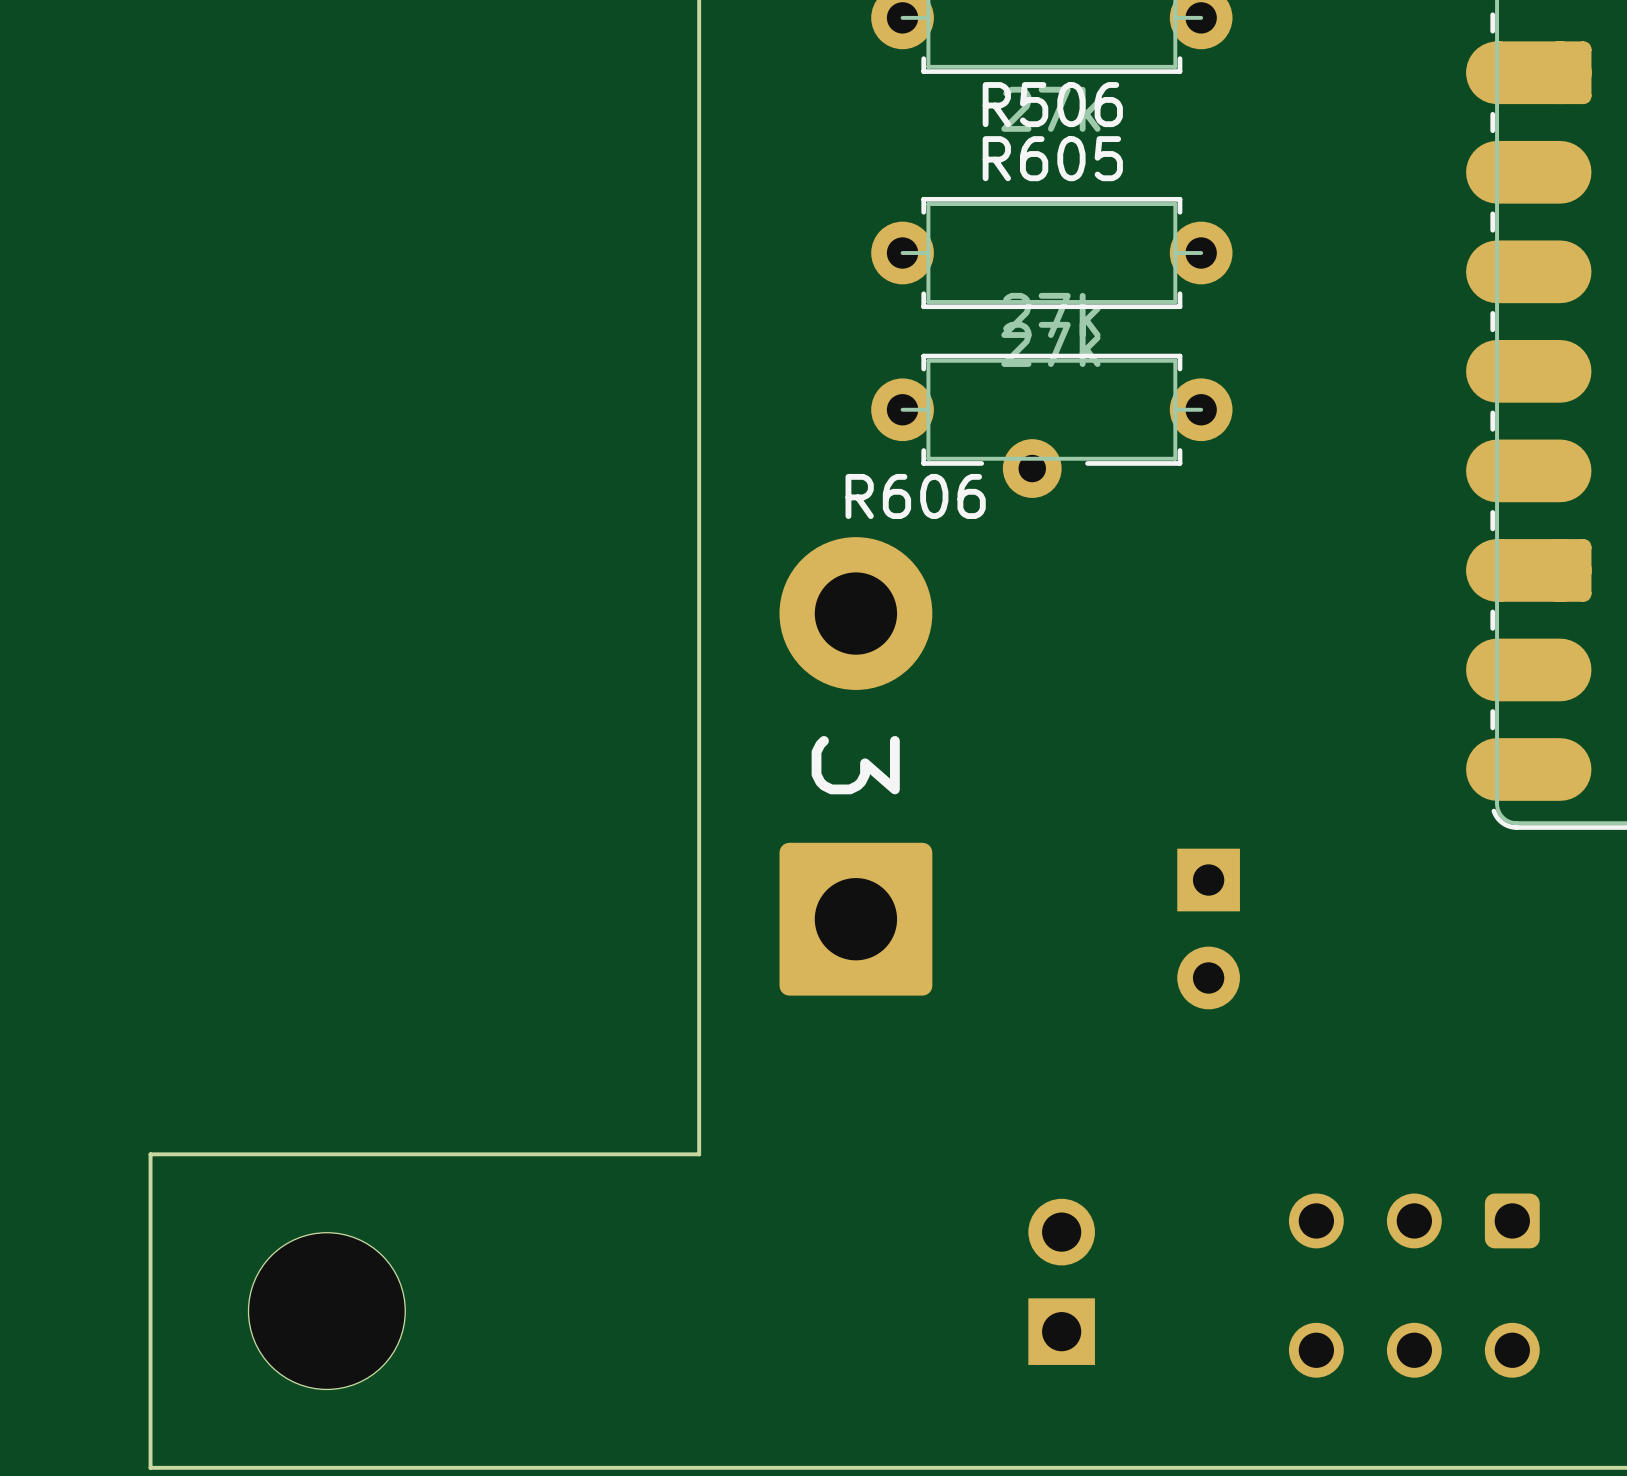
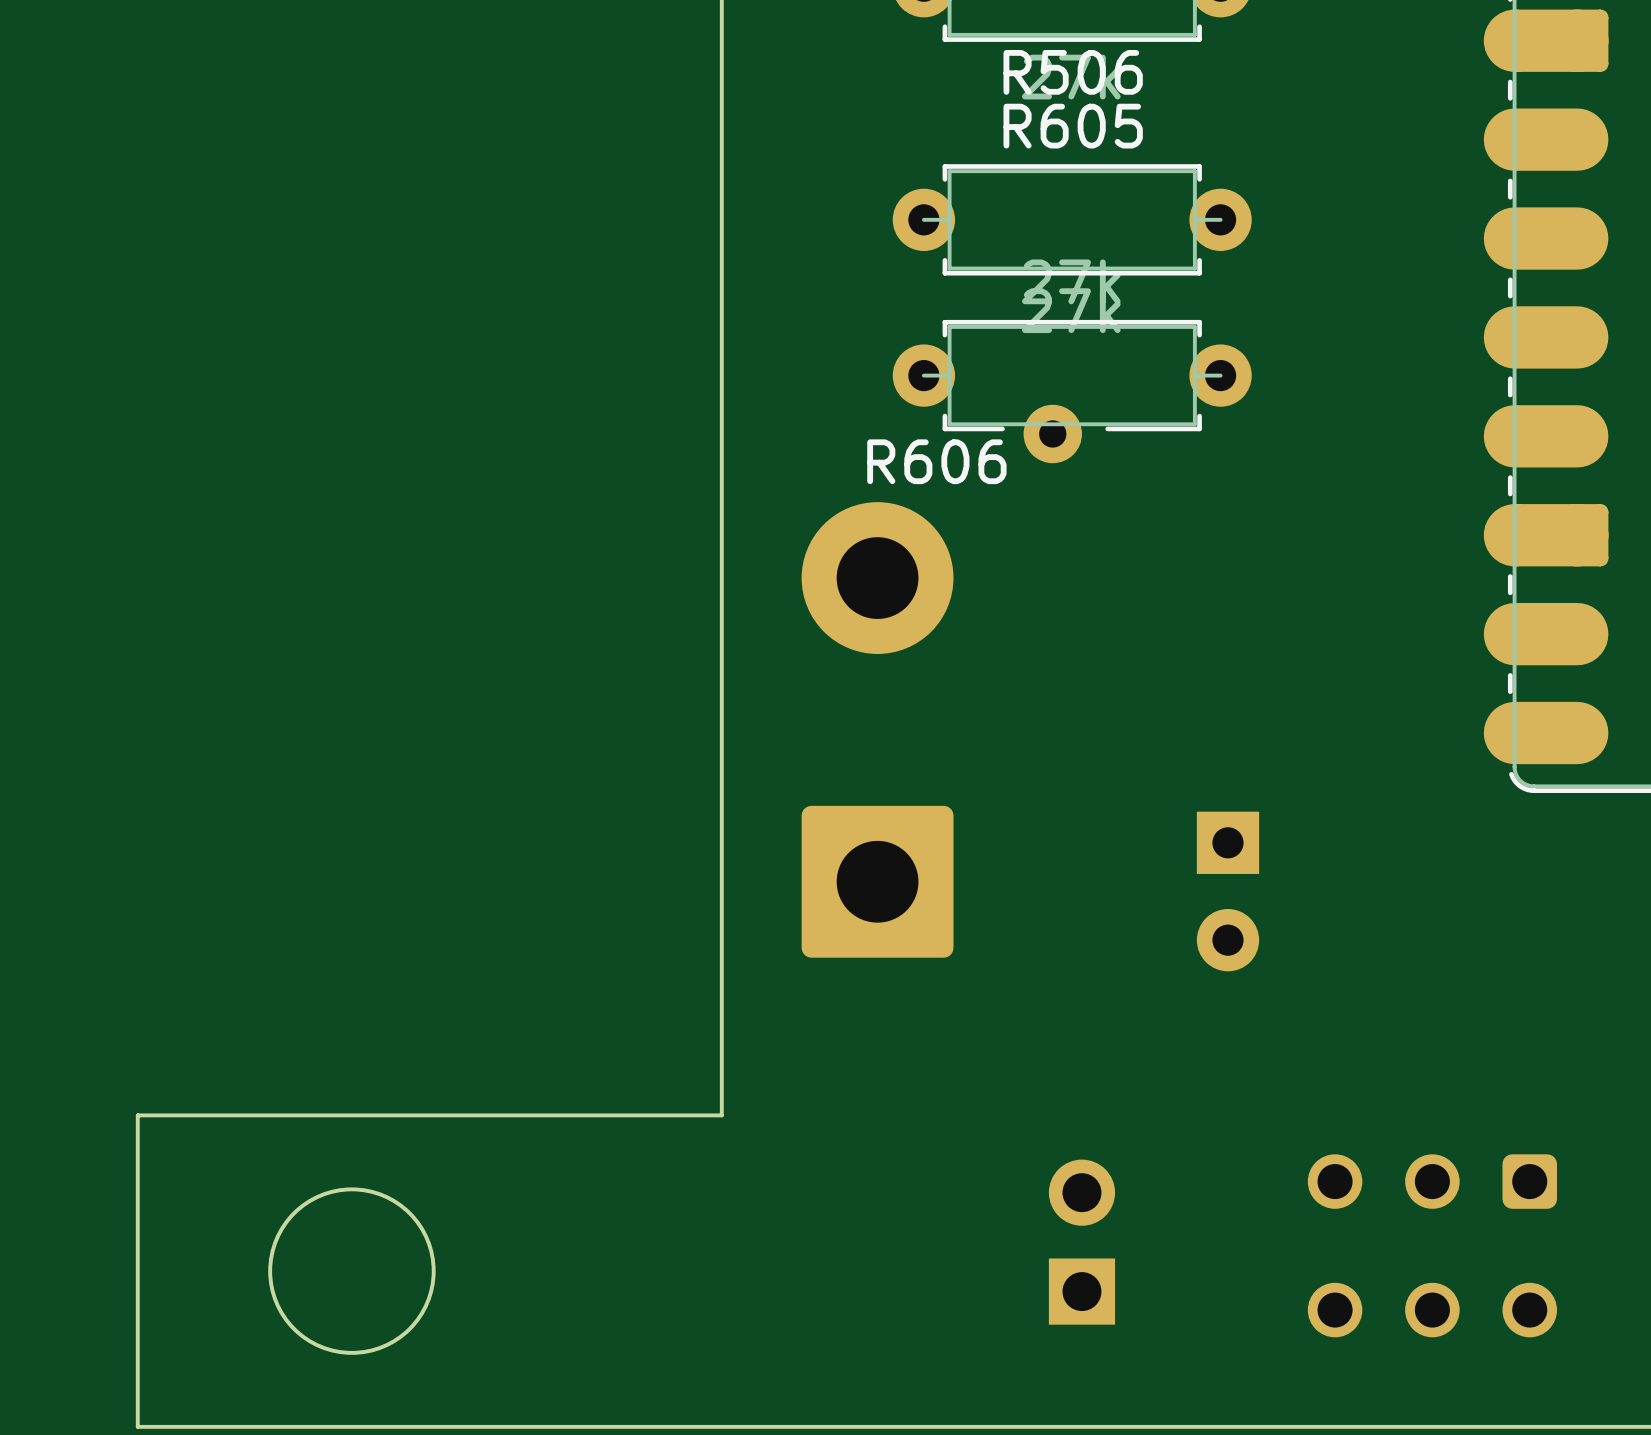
text: 3 (855, 765) -> none
board edge: (150, 1154) (150, 1467) -> (176, 1115) (137, 1115) (137, 1426) (176, 1426)
round board edge: none -> [268, 1187, 436, 1355]
part: (326, 1311) -> none

